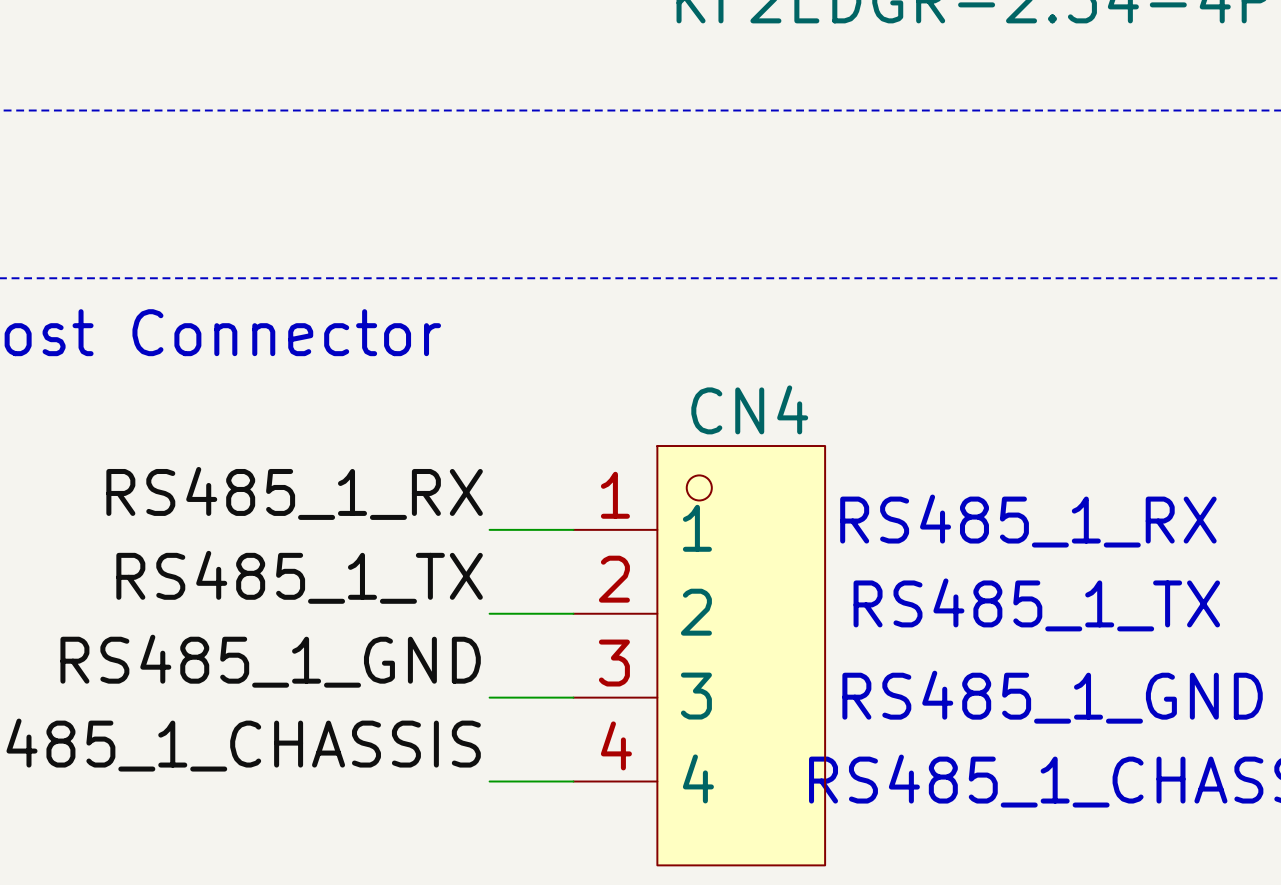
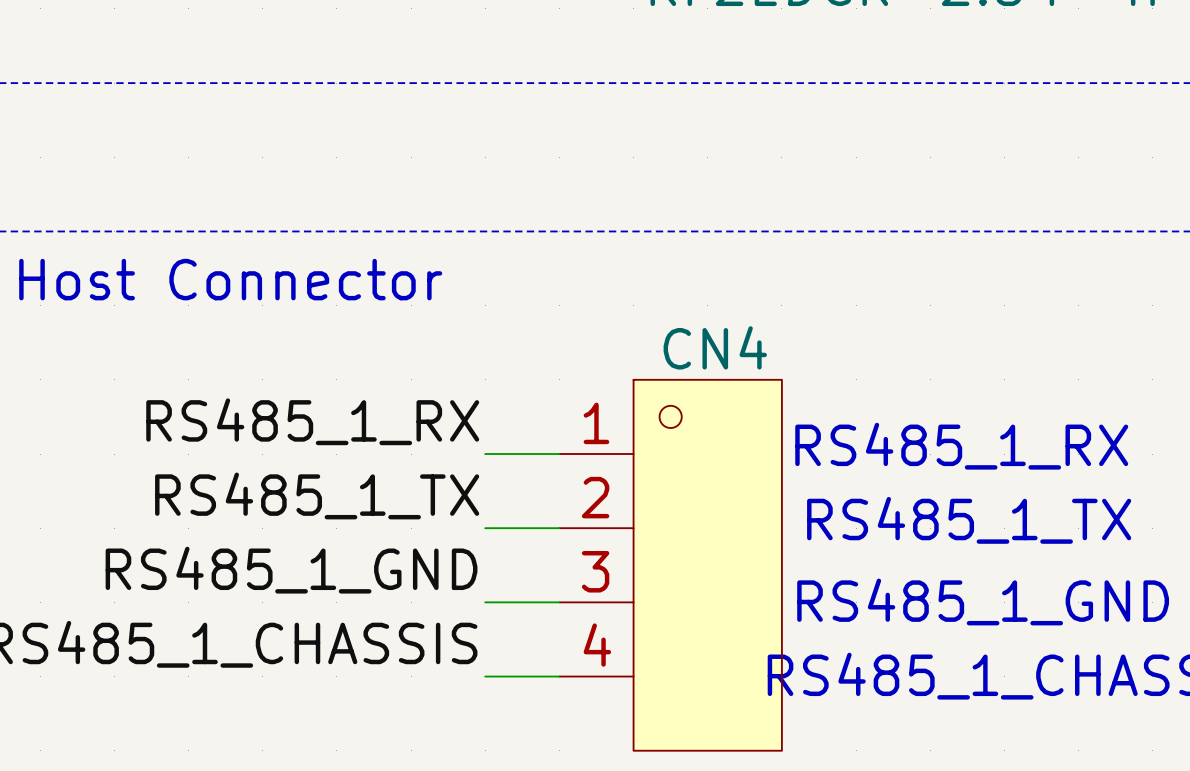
CN4 pin name: 1 (697, 528) -> none
CN4 pin name: 2 (696, 612) -> none
CN4 pin name: 3 (696, 696) -> none
CN4 pin name: 4 (698, 778) -> none

